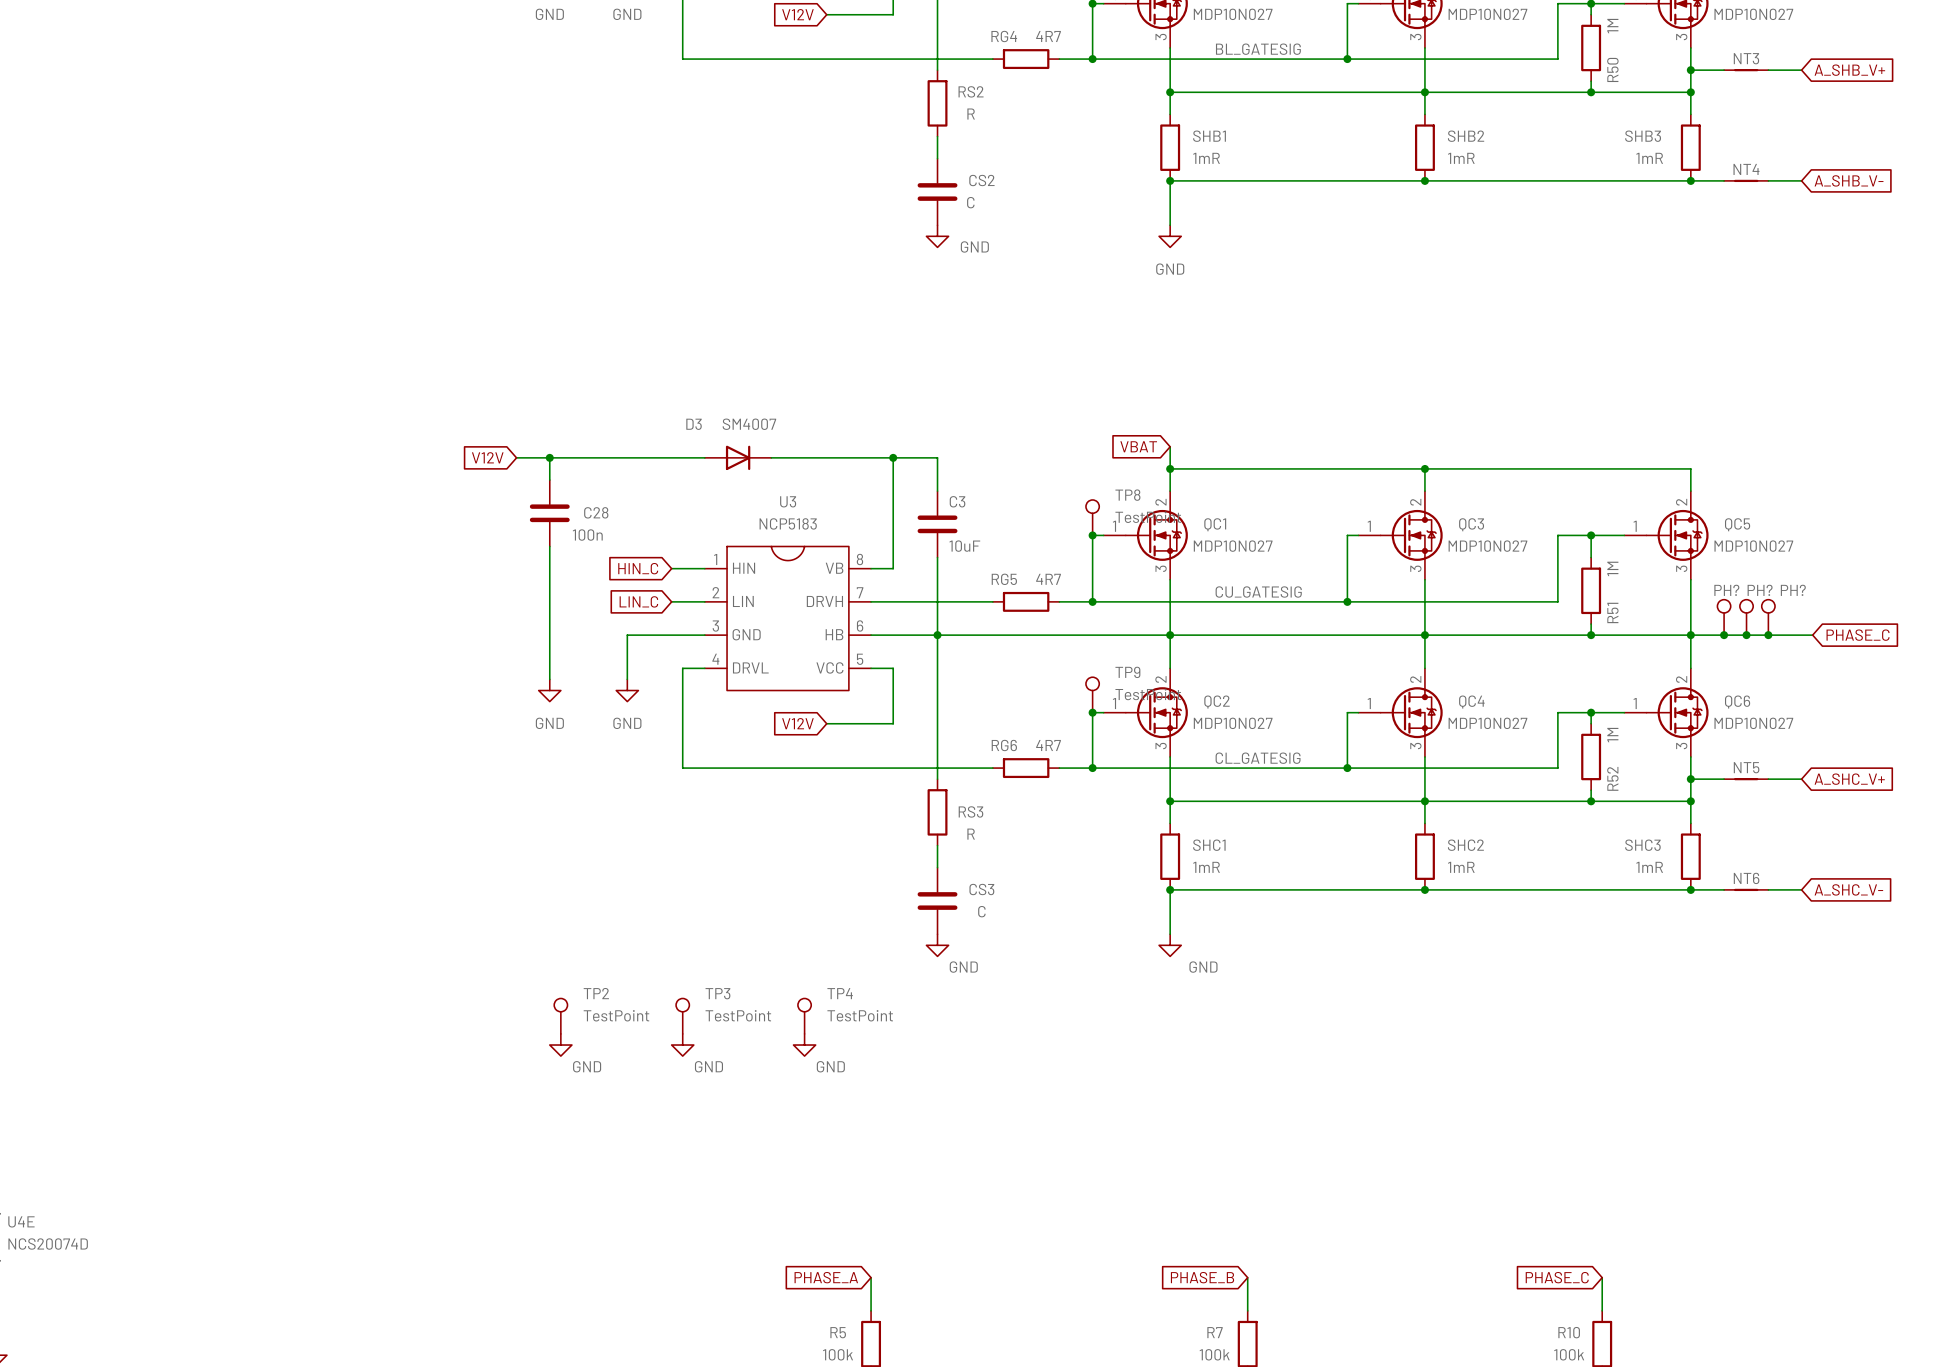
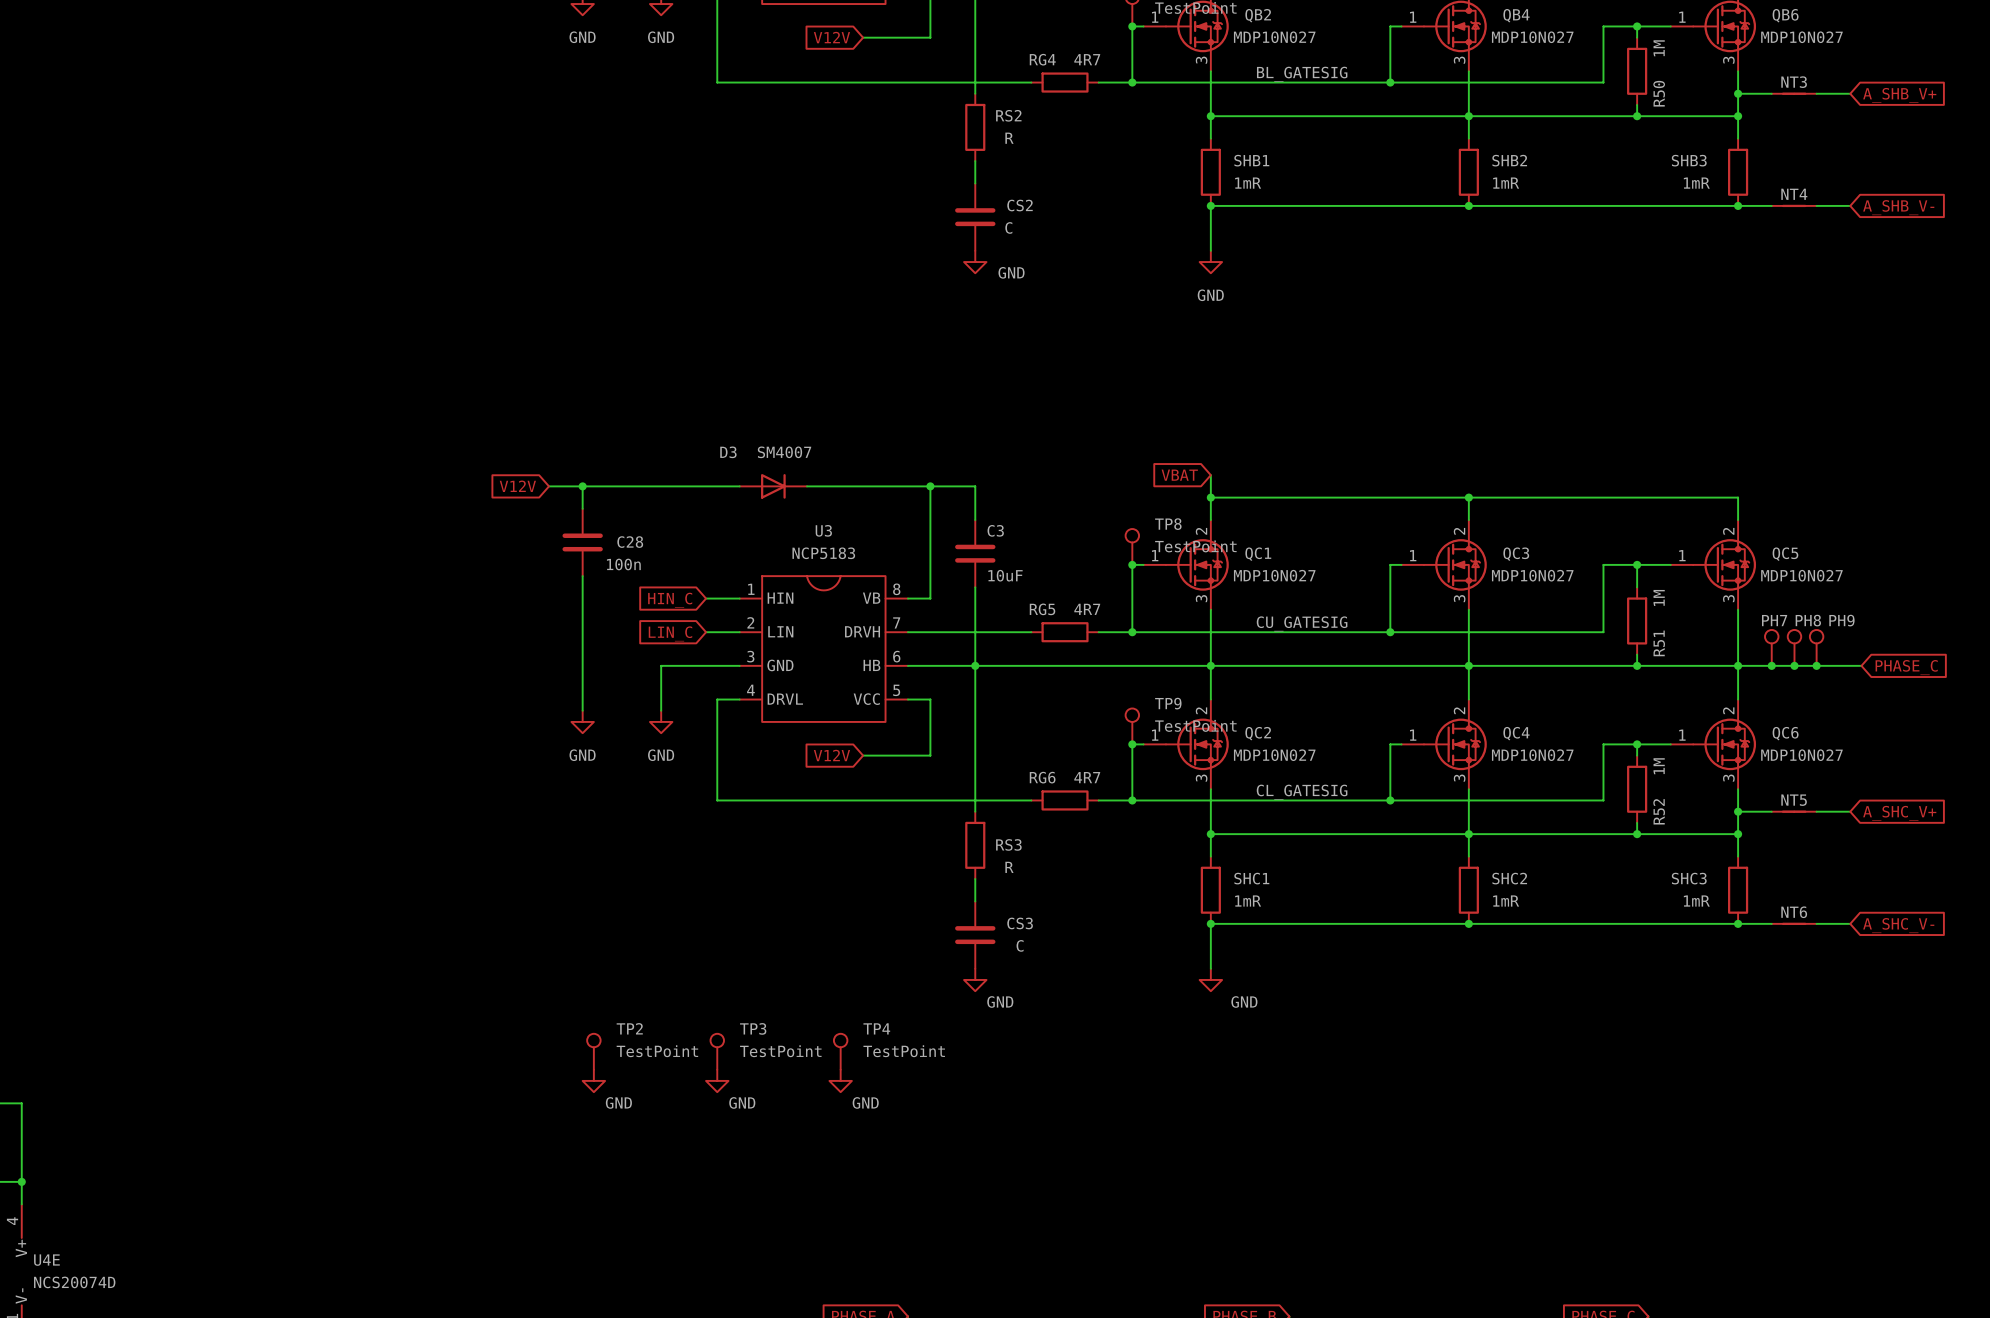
PH? name: PH? (1726, 590) -> PH7 (1774, 620)
PH? name: PH? (1760, 590) -> PH8 (1808, 620)
PH? name: PH? (1793, 590) -> PH9 (1841, 620)

